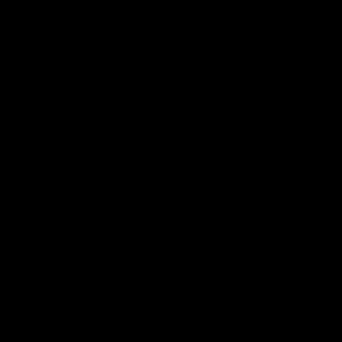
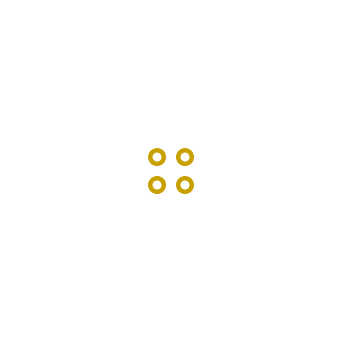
part: none -> (171, 171)

